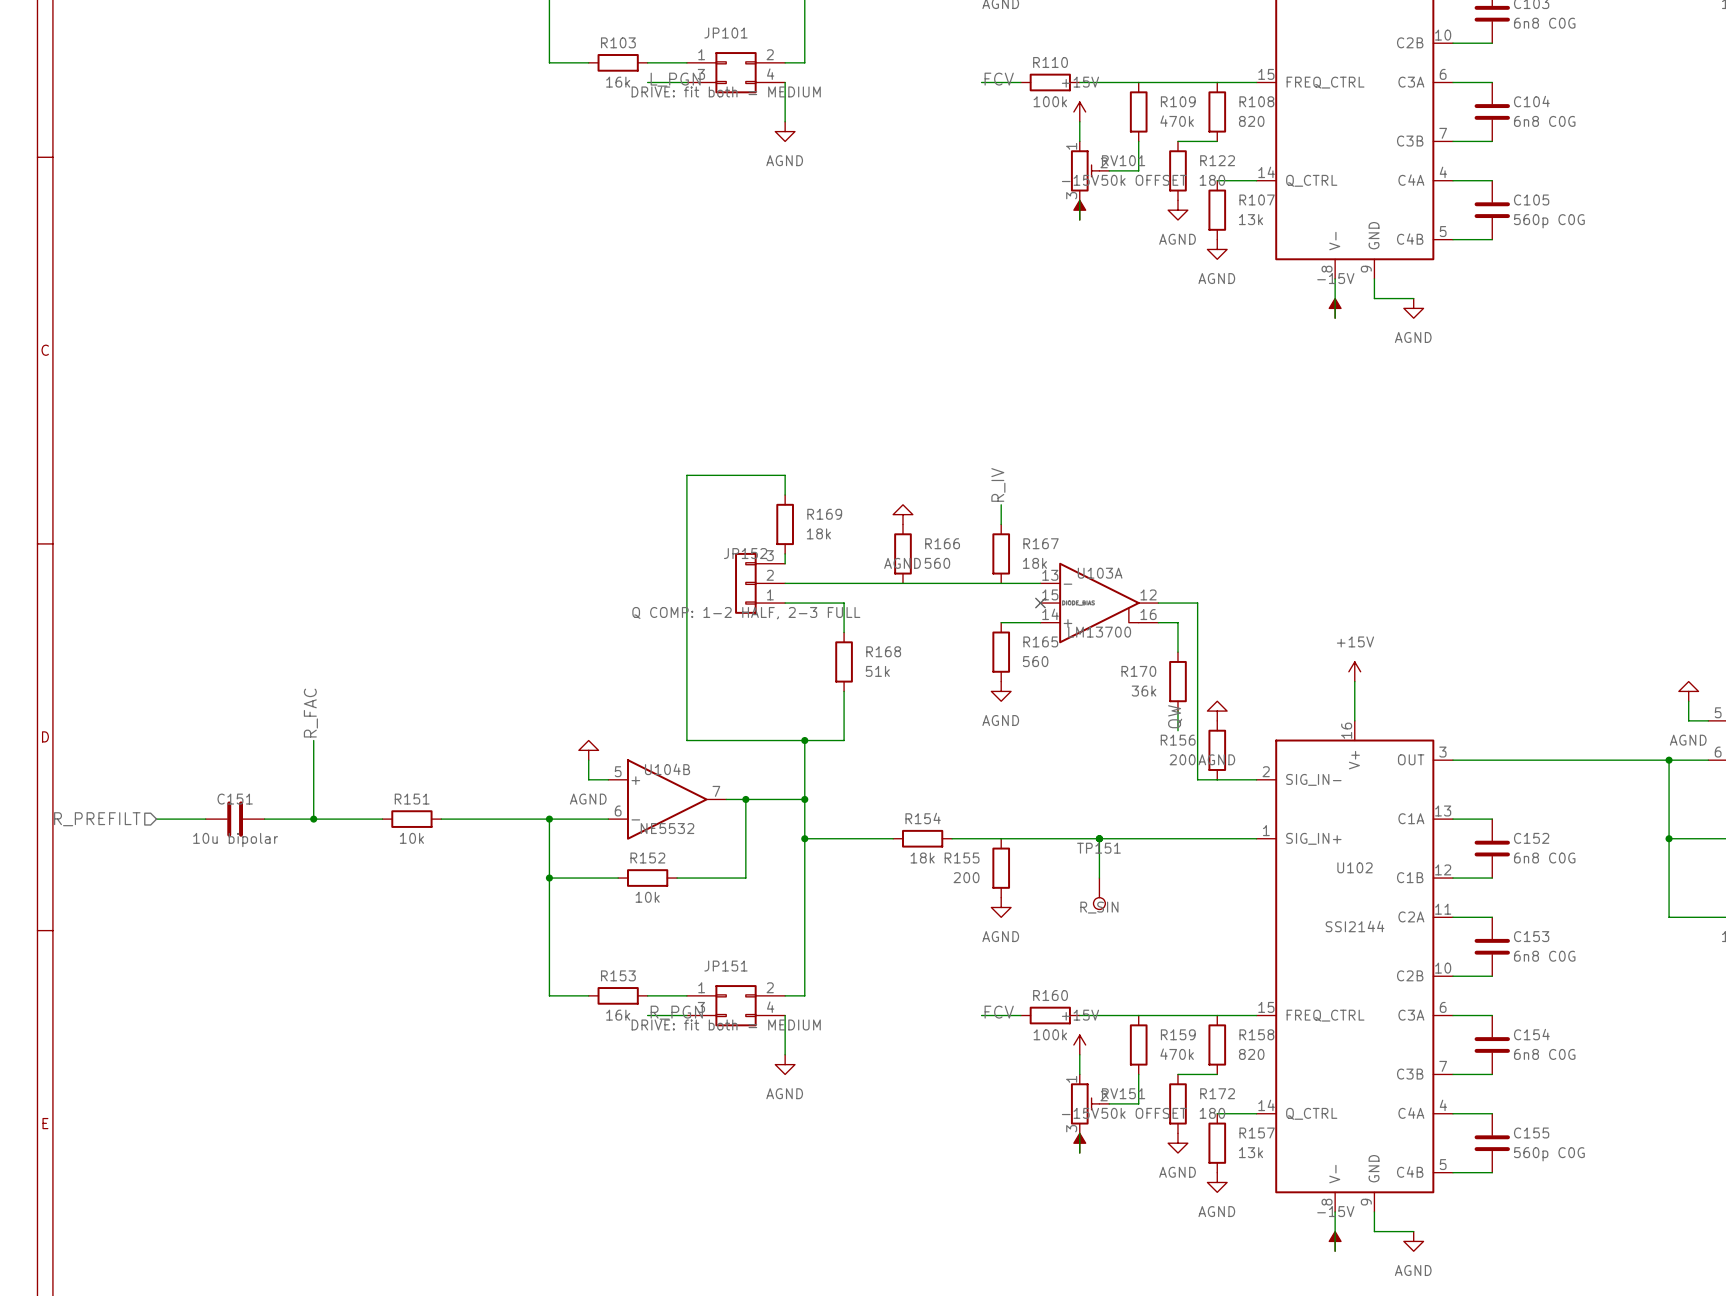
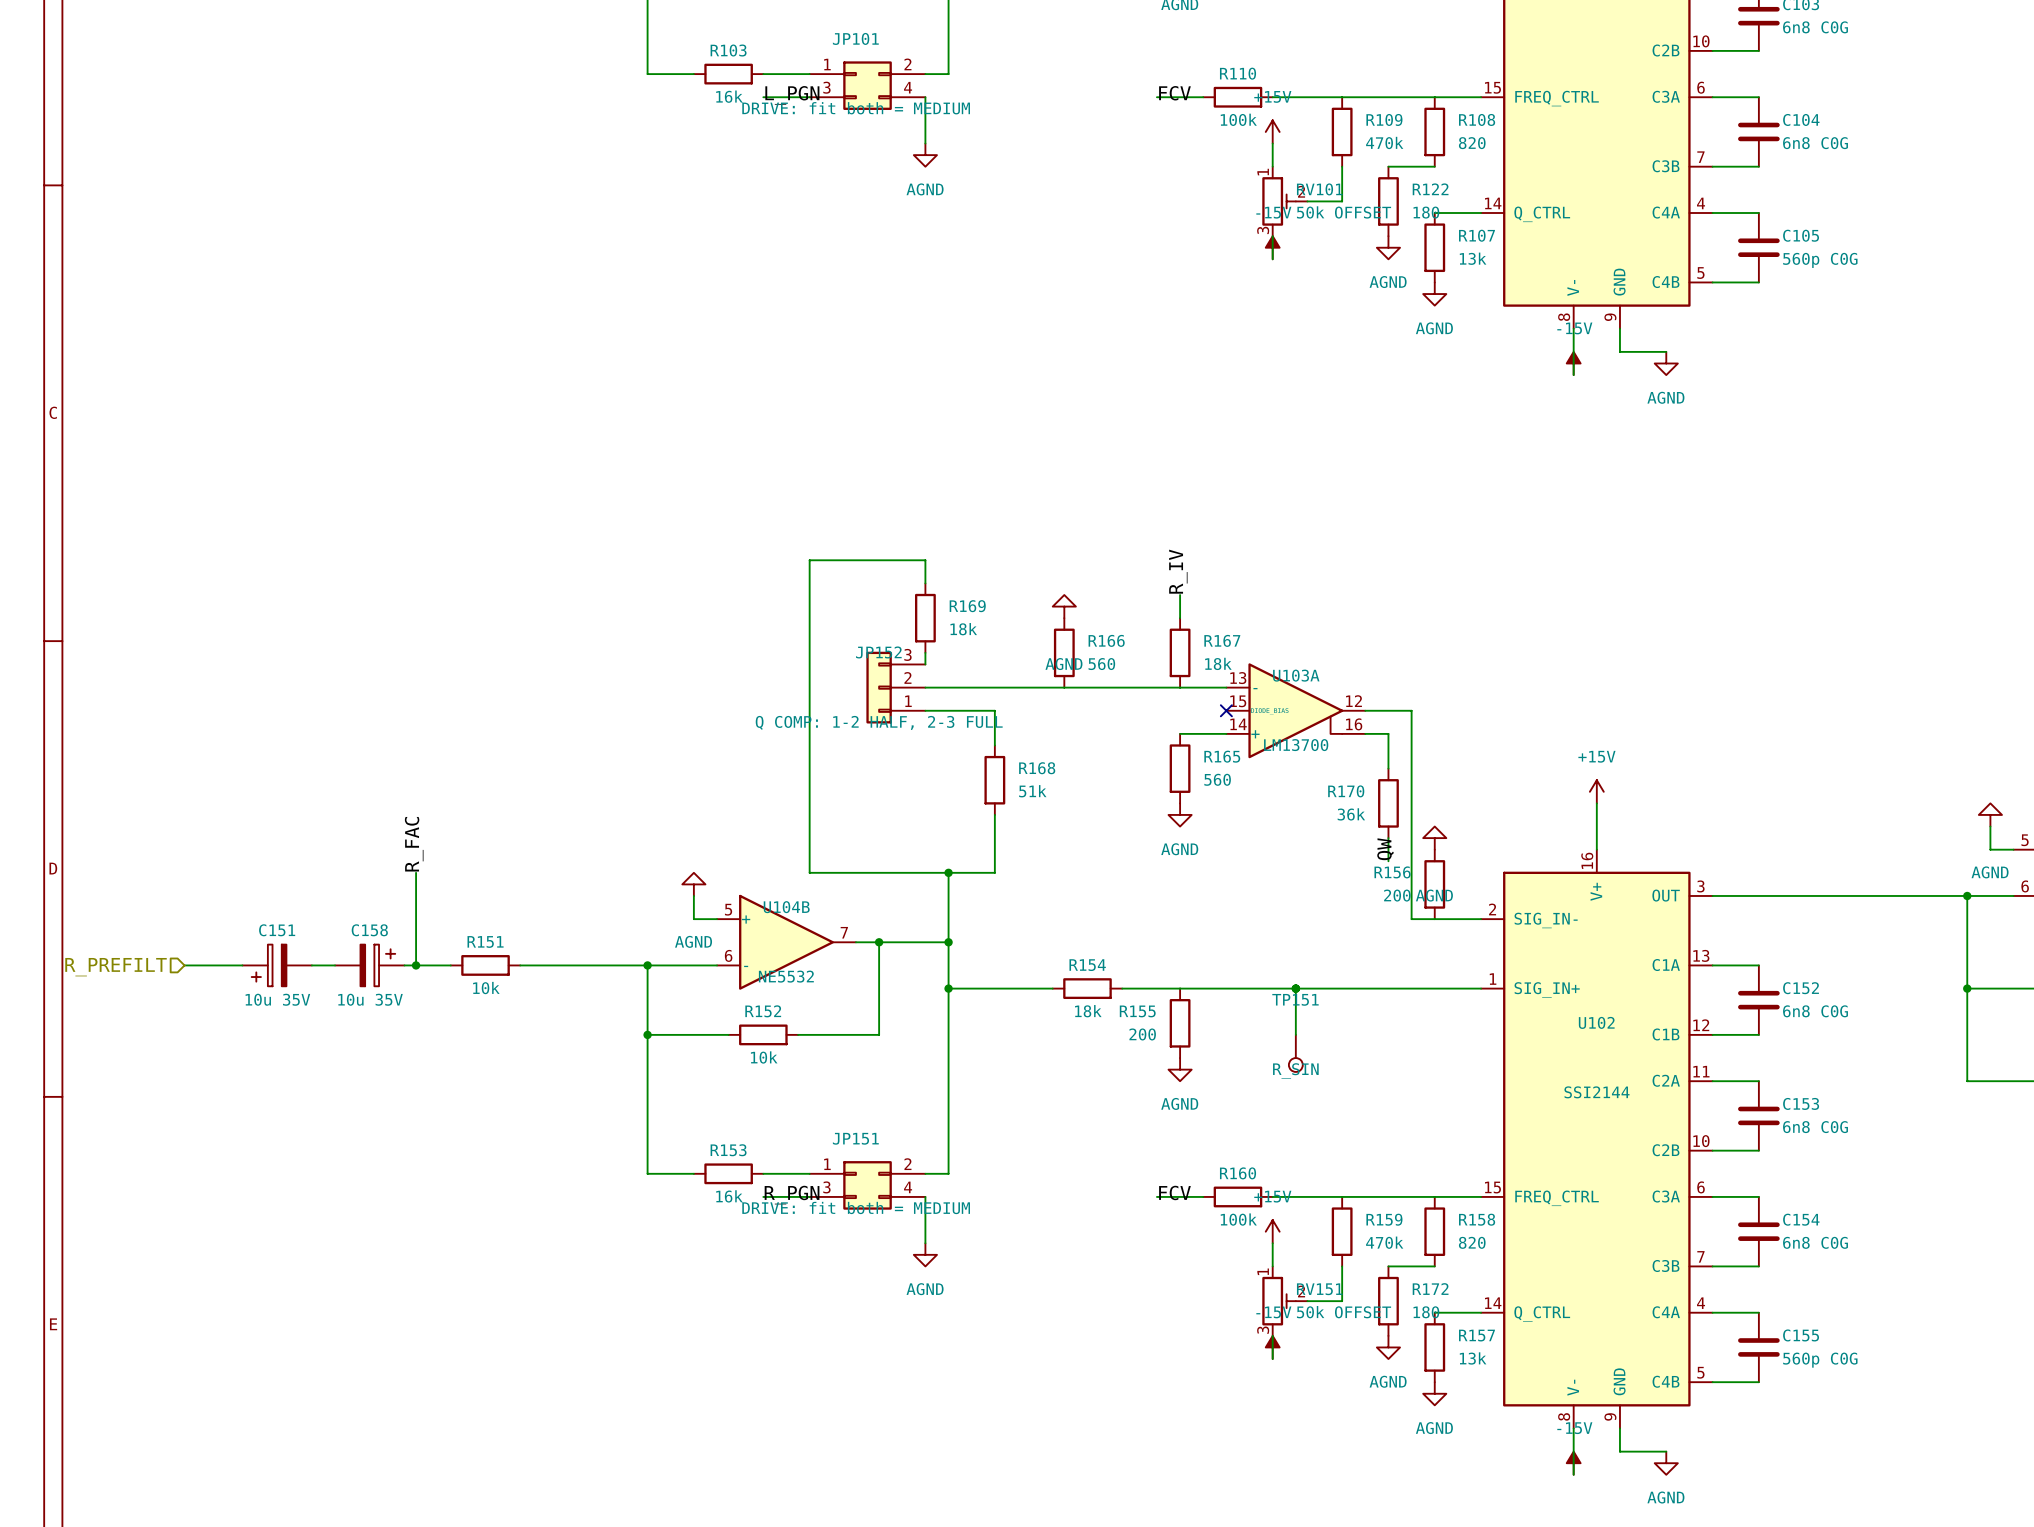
label position: R_FAC (310, 713) -> R_FAC (414, 844)
wire: (313, 740) (313, 819) -> (416, 872) (416, 965)
C151 symbol: [205, 801, 265, 837] -> [242, 944, 312, 987]
C158: none -> 10u 35V (369, 965)
junction position: (313, 819) -> (416, 965)
C151 value: 10u bipolar (235, 840) -> 10u 35V (277, 999)

